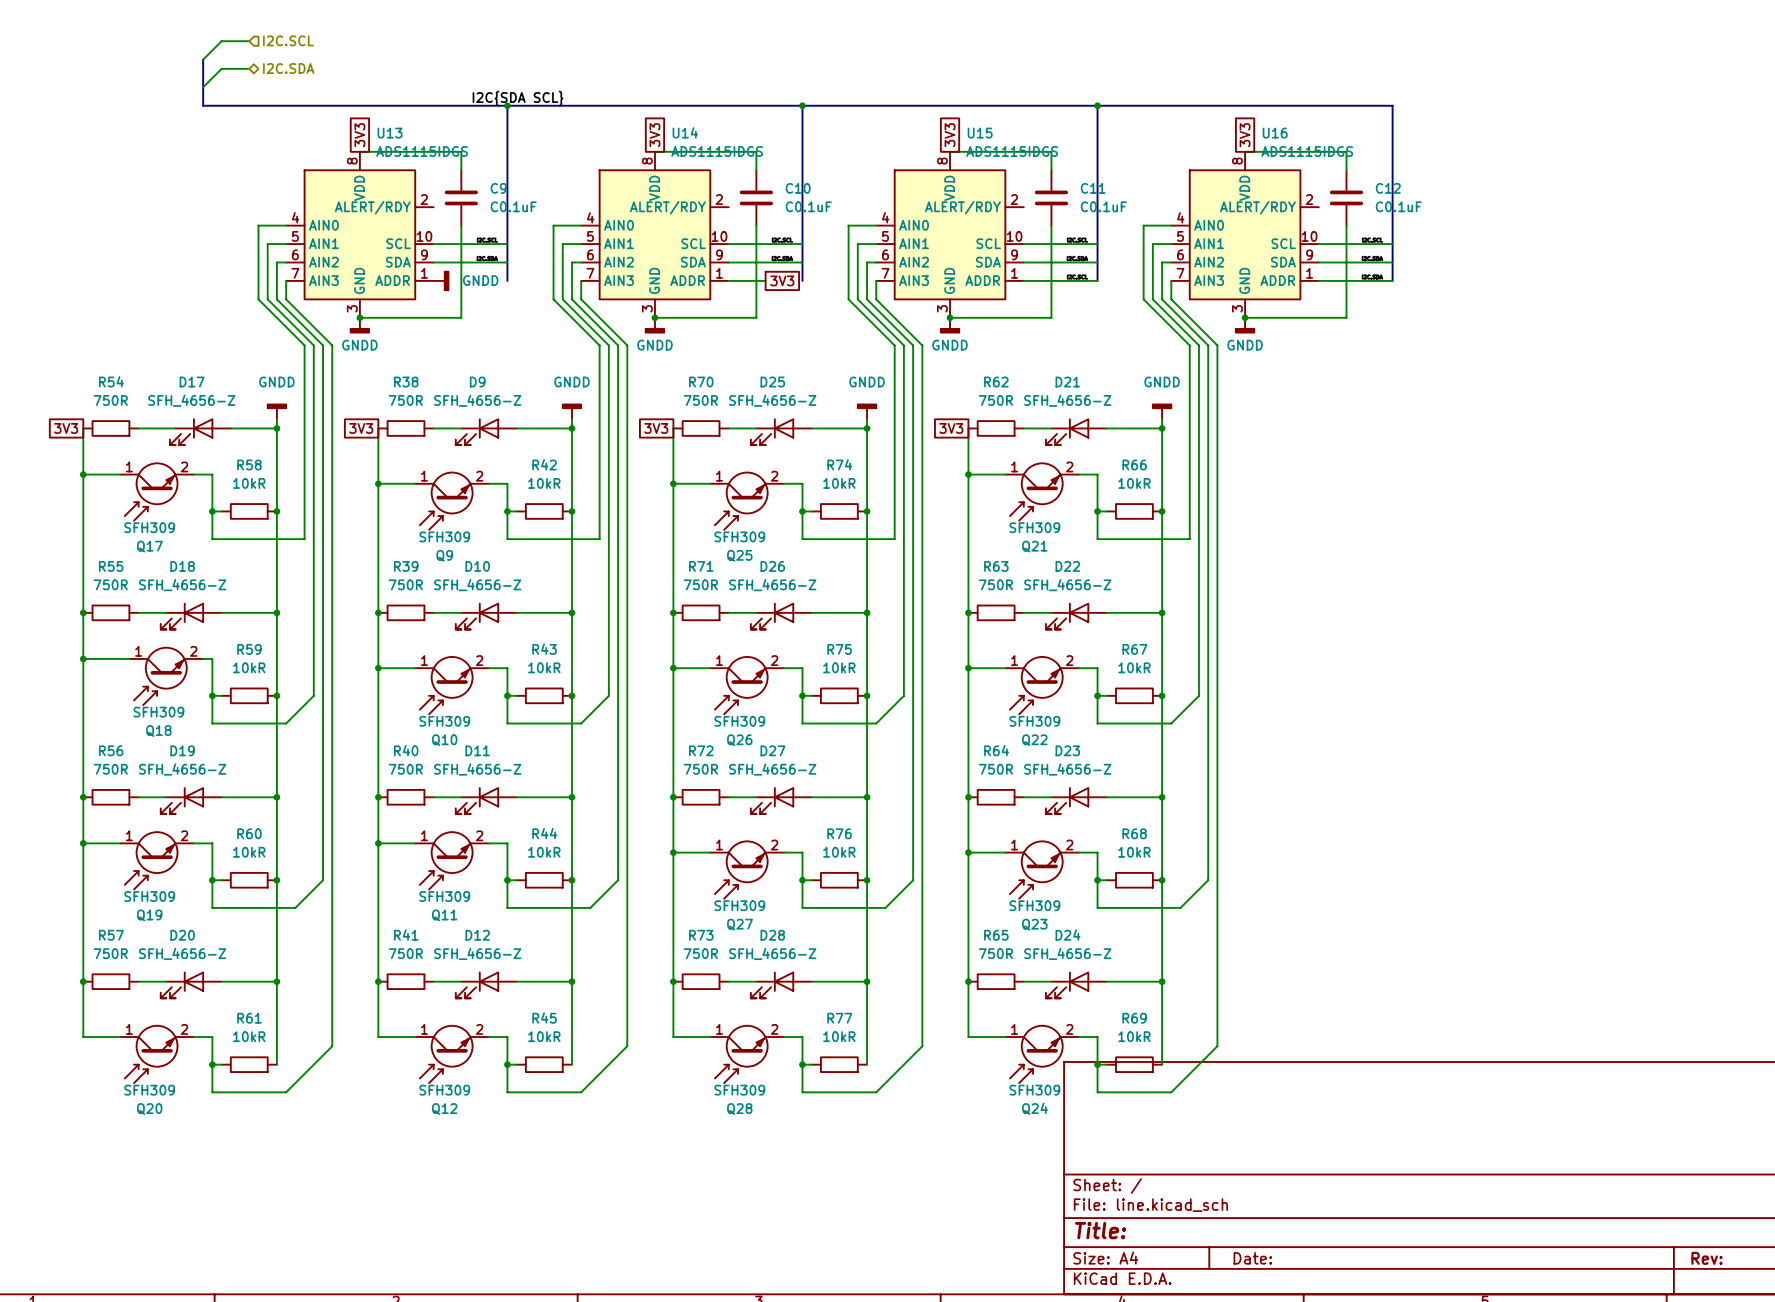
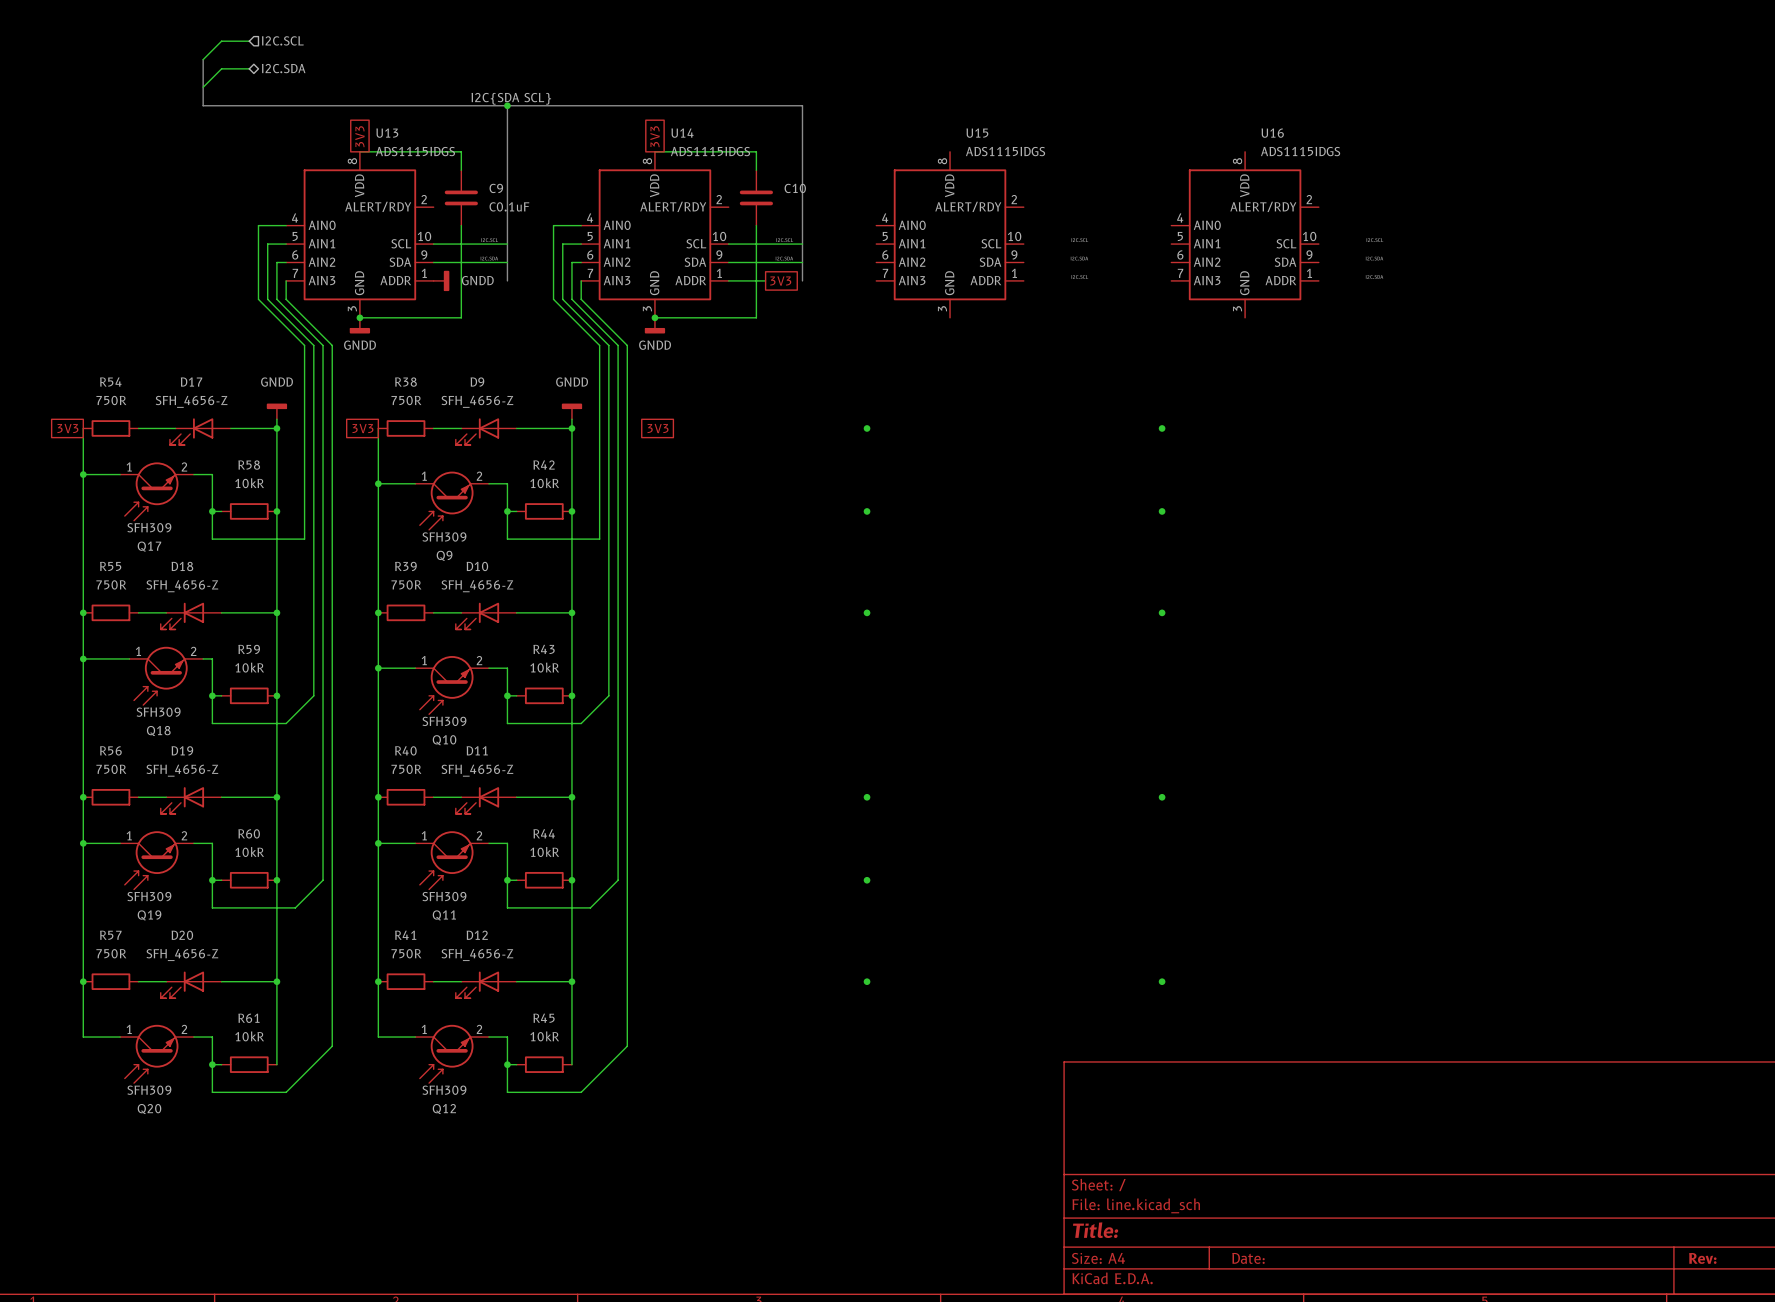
bus: (802, 105) (1392, 105) (1392, 280) -> none
junction: (802, 105) -> none
bus: (1097, 105) (1097, 280) -> none
junction: (1097, 105) -> none
global label: 3V3 (950, 135) -> none
global label: 3V3 (1245, 135) -> none
wire: (950, 151) (1051, 151) (1051, 170) -> none
wire: (1245, 151) (1346, 151) (1346, 170) -> none
C11: C0.1uF (1051, 197) -> none
C12: C0.1uF (1346, 197) -> none
C10 value: C0.1uF (808, 206) -> none
wire: (876, 225) (848, 225) (848, 299) (894, 345) (894, 539) (802, 539) (802, 483) (784, 483) -> none
wire: (1051, 225) (1051, 317) (950, 317) -> none
wire: (1171, 225) (1143, 225) (1143, 299) (1189, 345) (1189, 539) (1097, 539) (1097, 474) (1079, 474) -> none
wire: (1346, 225) (1346, 317) (1245, 317) -> none
wire: (876, 244) (857, 244) (857, 299) (903, 345) (903, 695) (876, 723) (802, 723) (802, 668) (784, 668) -> none
wire: (1023, 244) (1097, 244) -> none
wire: (1171, 244) (1152, 244) (1152, 299) (1198, 345) (1198, 695) (1171, 723) (1097, 723) (1097, 668) (1079, 668) -> none
wire: (1318, 244) (1392, 244) -> none
wire: (876, 262) (867, 262) (867, 299) (913, 345) (913, 880) (885, 907) (802, 907) (802, 852) (784, 852) -> none
wire: (1023, 262) (1097, 262) -> none
wire: (1171, 262) (1162, 262) (1162, 299) (1208, 345) (1208, 880) (1180, 907) (1097, 907) (1097, 852) (1079, 852) -> none
wire: (1318, 262) (1392, 262) -> none
wire: (876, 280) (876, 299) (922, 345) (922, 1046) (876, 1092) (802, 1092) (802, 1037) (784, 1037) -> none
wire: (1023, 280) (1097, 280) -> none
wire: (1171, 280) (1171, 299) (1217, 345) (1217, 1046) (1171, 1092) (1097, 1092) (1097, 1037) (1079, 1037) -> none
wire: (1318, 280) (1392, 280) -> none
junction: (950, 317) -> none
junction: (1245, 317) -> none
power symbol: GNDD (950, 325) -> none
power symbol: GNDD (1245, 325) -> none
power symbol: GNDD (867, 411) -> none
power symbol: GNDD (1162, 411) -> none
wire: (867, 419) (867, 1064) -> none
wire: (1162, 419) (1162, 1064) -> none
wire: (673, 428) (673, 1037) (710, 1037) -> none
R70: 750R (701, 428) -> none
wire: (728, 428) (756, 428) -> none
wire: (811, 428) (867, 428) -> none
global label: 3V3 (951, 428) -> none
wire: (968, 428) (968, 1037) (1005, 1037) -> none
R62: 750R (996, 428) -> none
wire: (1023, 428) (1051, 428) -> none
wire: (1106, 428) (1162, 428) -> none
D25: SFH_4656-Z (781, 431) -> none
D21: SFH_4656-Z (1076, 431) -> none
wire: (968, 474) (1005, 474) -> none
junction: (968, 474) -> none
wire: (673, 483) (710, 483) -> none
junction: (673, 483) -> none
Q21: SFH309 (1042, 491) -> none
Q25: SFH309 (747, 500) -> none
wire: (802, 511) (811, 511) -> none
junction: (802, 511) -> none
R74: 10kR (839, 511) -> none
wire: (1097, 511) (1106, 511) -> none
junction: (1097, 511) -> none
R66: 10kR (1134, 511) -> none
junction: (673, 612) -> none
R71: 750R (701, 612) -> none
wire: (728, 612) (756, 612) -> none
wire: (811, 612) (867, 612) -> none
junction: (968, 612) -> none
R63: 750R (996, 612) -> none
wire: (1023, 612) (1051, 612) -> none
wire: (1106, 612) (1162, 612) -> none
D26: SFH_4656-Z (781, 616) -> none
D22: SFH_4656-Z (1076, 616) -> none
wire: (673, 668) (710, 668) -> none
junction: (673, 668) -> none
wire: (968, 668) (1005, 668) -> none
junction: (968, 668) -> none
Q26: SFH309 (747, 685) -> none
Q22: SFH309 (1042, 685) -> none
wire: (802, 695) (811, 695) -> none
junction: (802, 695) -> none
R75: 10kR (839, 695) -> none
junction: (867, 695) -> none
wire: (1097, 695) (1106, 695) -> none
junction: (1097, 695) -> none
R67: 10kR (1134, 695) -> none
junction: (1162, 695) -> none
junction: (673, 797) -> none
R72: 750R (701, 797) -> none
wire: (728, 797) (756, 797) -> none
wire: (811, 797) (867, 797) -> none
junction: (968, 797) -> none
R64: 750R (996, 797) -> none
wire: (1023, 797) (1051, 797) -> none
wire: (1106, 797) (1162, 797) -> none
D27: SFH_4656-Z (781, 800) -> none
D23: SFH_4656-Z (1076, 800) -> none
wire: (673, 852) (710, 852) -> none
junction: (673, 852) -> none
wire: (968, 852) (1005, 852) -> none
junction: (968, 852) -> none
Q27: SFH309 (747, 869) -> none
Q23: SFH309 (1042, 869) -> none
wire: (802, 880) (811, 880) -> none
junction: (802, 880) -> none
R76: 10kR (839, 880) -> none
wire: (1097, 880) (1106, 880) -> none
junction: (1097, 880) -> none
R68: 10kR (1134, 880) -> none
junction: (1162, 880) -> none
junction: (673, 981) -> none
R73: 750R (701, 981) -> none
wire: (728, 981) (756, 981) -> none
wire: (811, 981) (867, 981) -> none
junction: (968, 981) -> none
R65: 750R (996, 981) -> none
wire: (1023, 981) (1051, 981) -> none
wire: (1106, 981) (1162, 981) -> none
D28: SFH_4656-Z (781, 984) -> none
D24: SFH_4656-Z (1076, 984) -> none
Q28: SFH309 (747, 1053) -> none
Q24: SFH309 (1042, 1053) -> none
wire: (802, 1064) (811, 1064) -> none
junction: (802, 1064) -> none
R77: 10kR (839, 1064) -> none
wire: (1097, 1064) (1106, 1064) -> none
junction: (1097, 1064) -> none
R69: 10kR (1134, 1064) -> none

